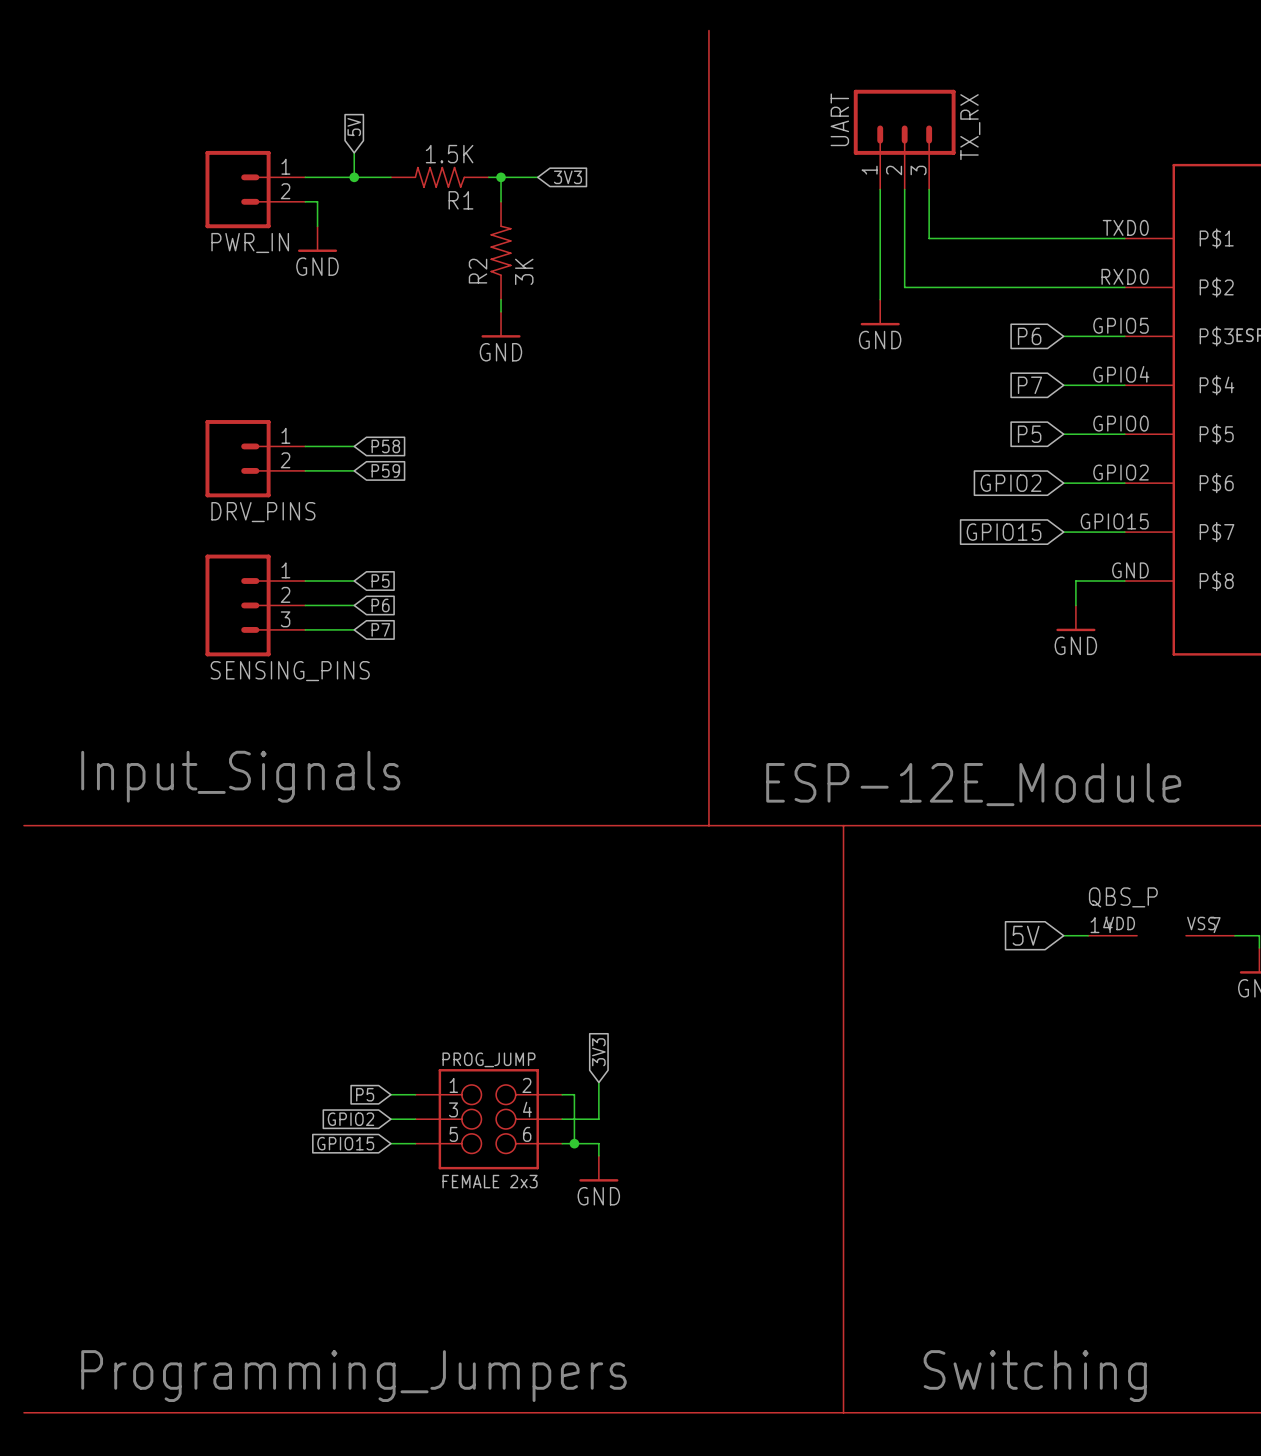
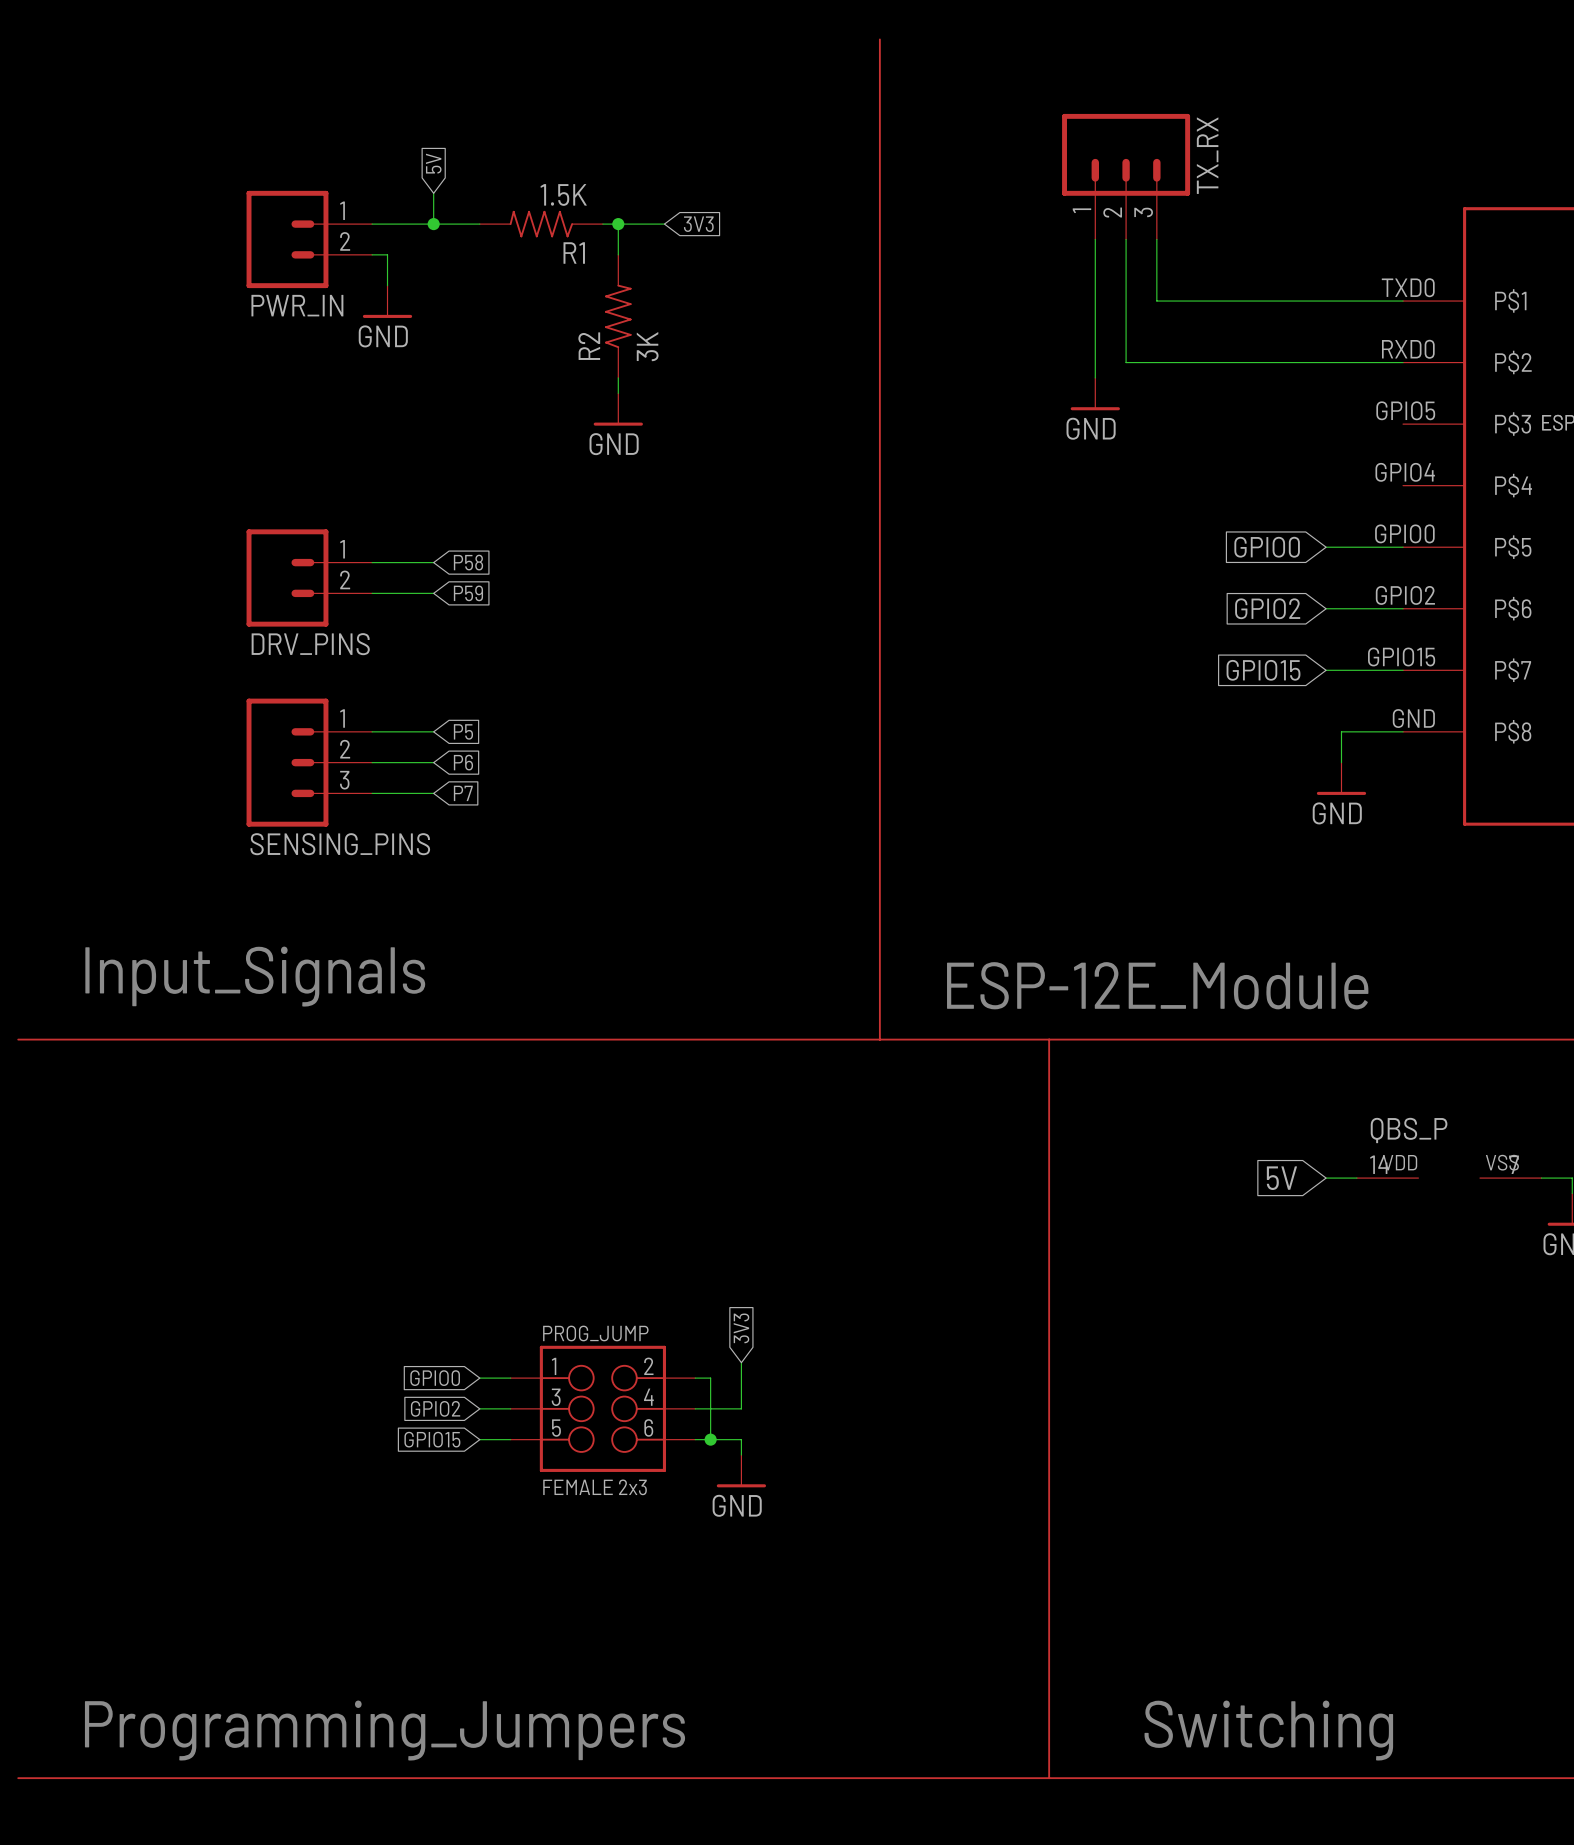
TX_RX value: UART (839, 119) -> none
global label: P6 (1029, 336) -> none
wire: (1063, 336) (1124, 336) -> none
global label: P7 (1029, 385) -> none
wire: (1063, 385) (1124, 385) -> none
global label: P5 (1029, 434) -> GPIO0 (1267, 547)
global label: P5 (365, 1094) -> GPIO0 (435, 1378)

